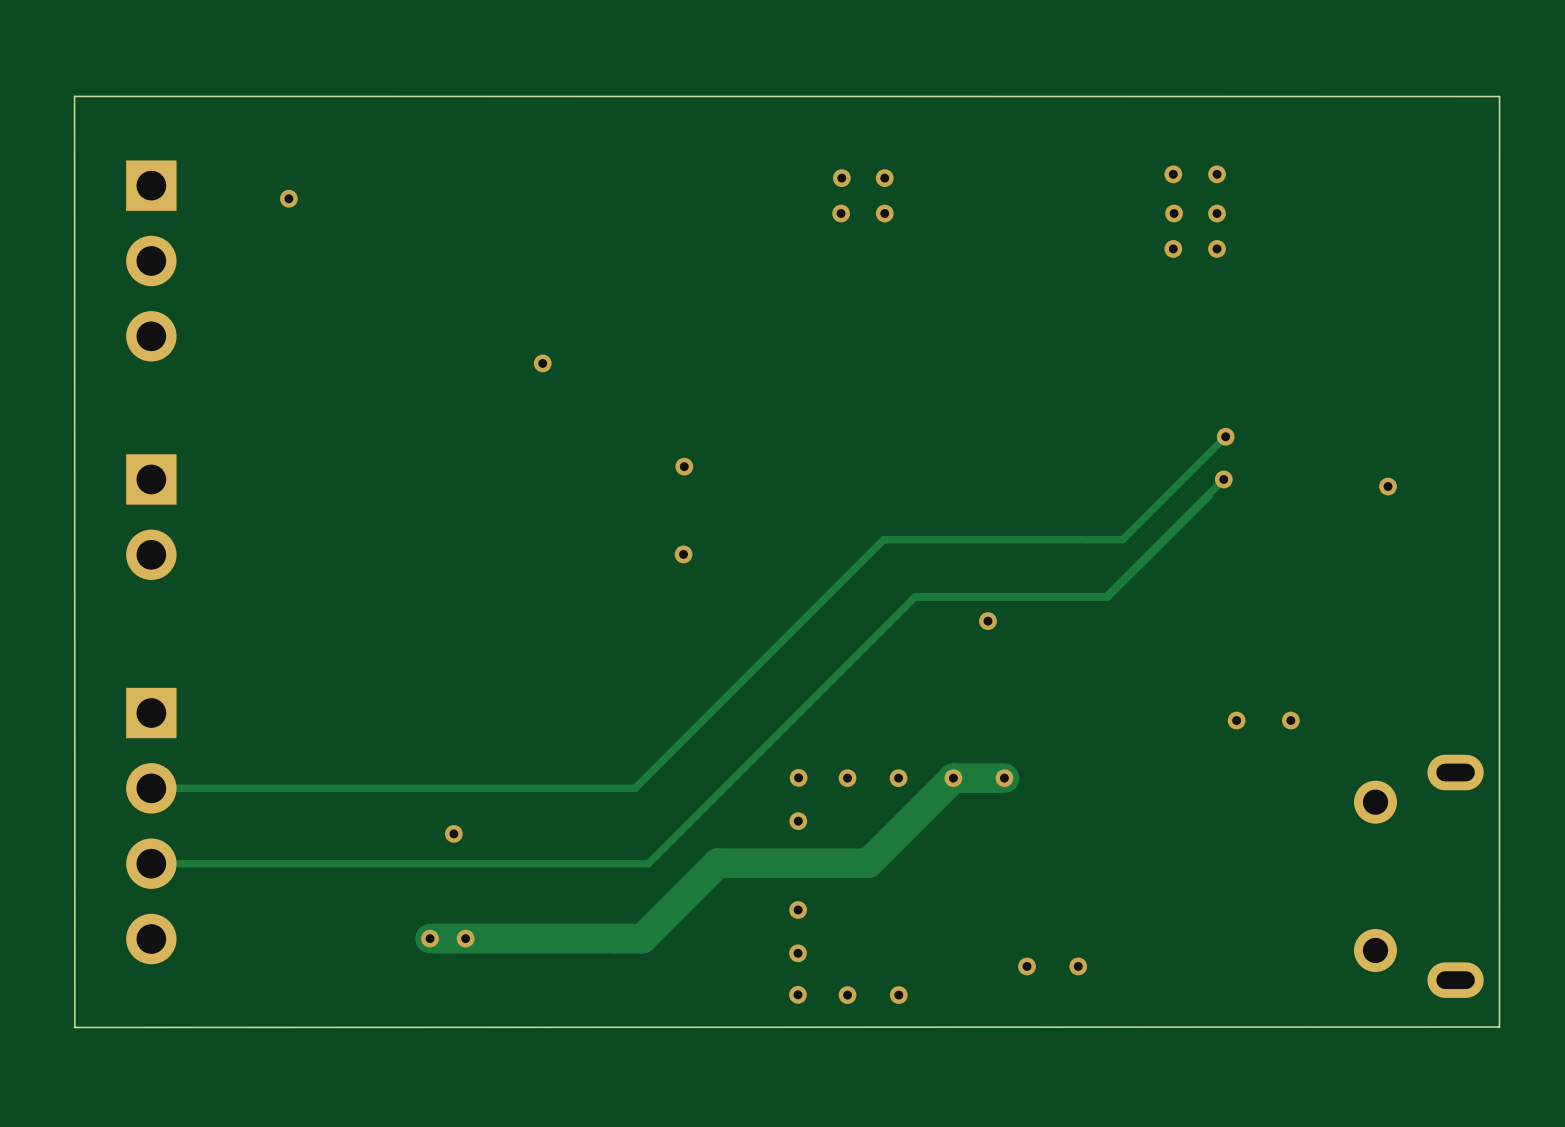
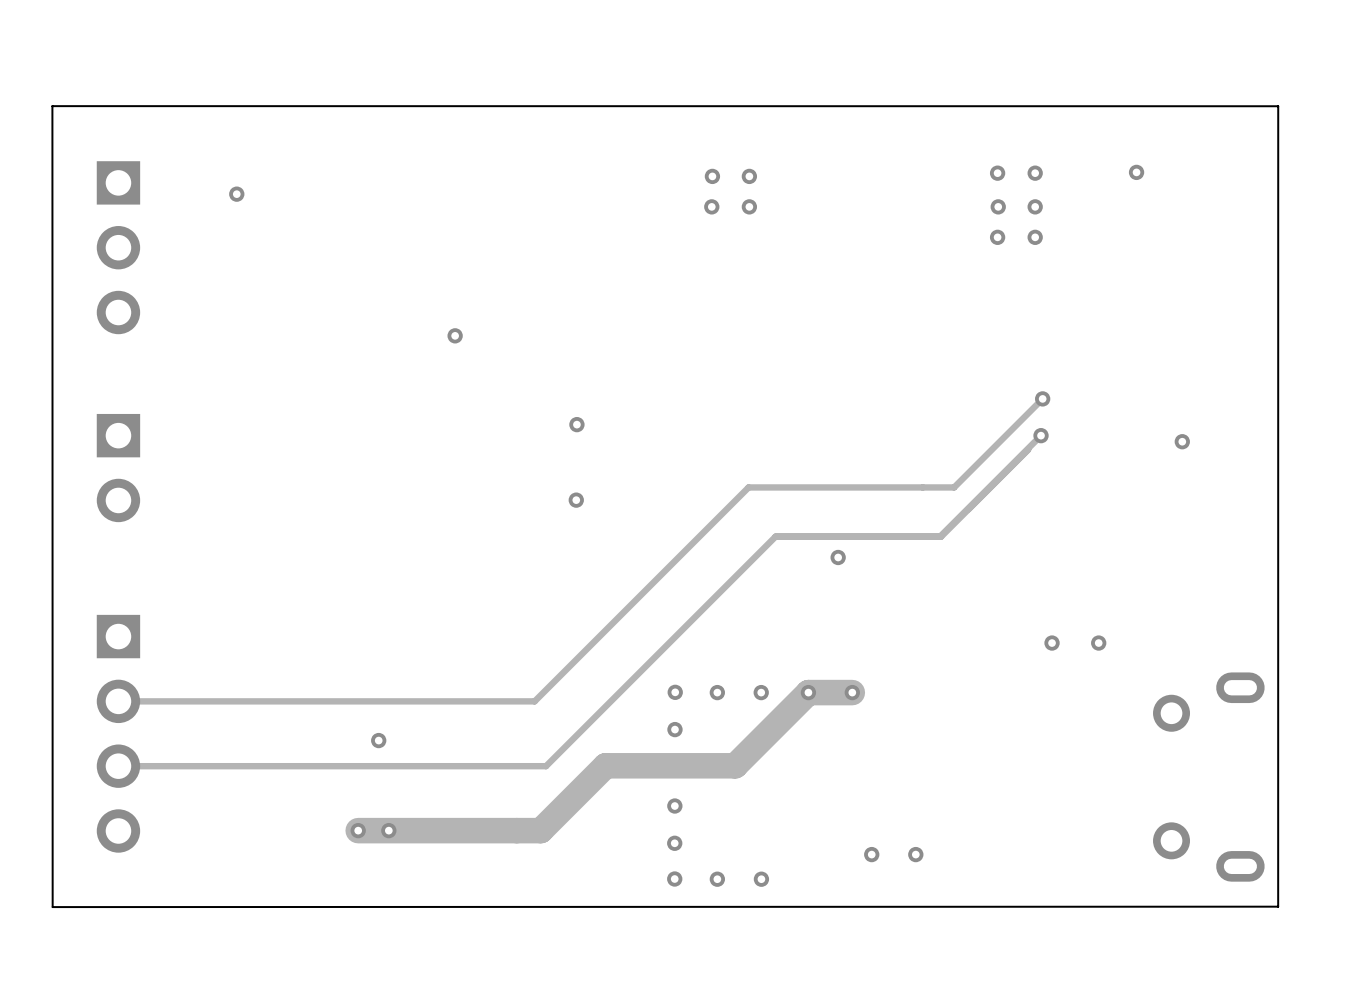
via: none -> (1136, 172)

